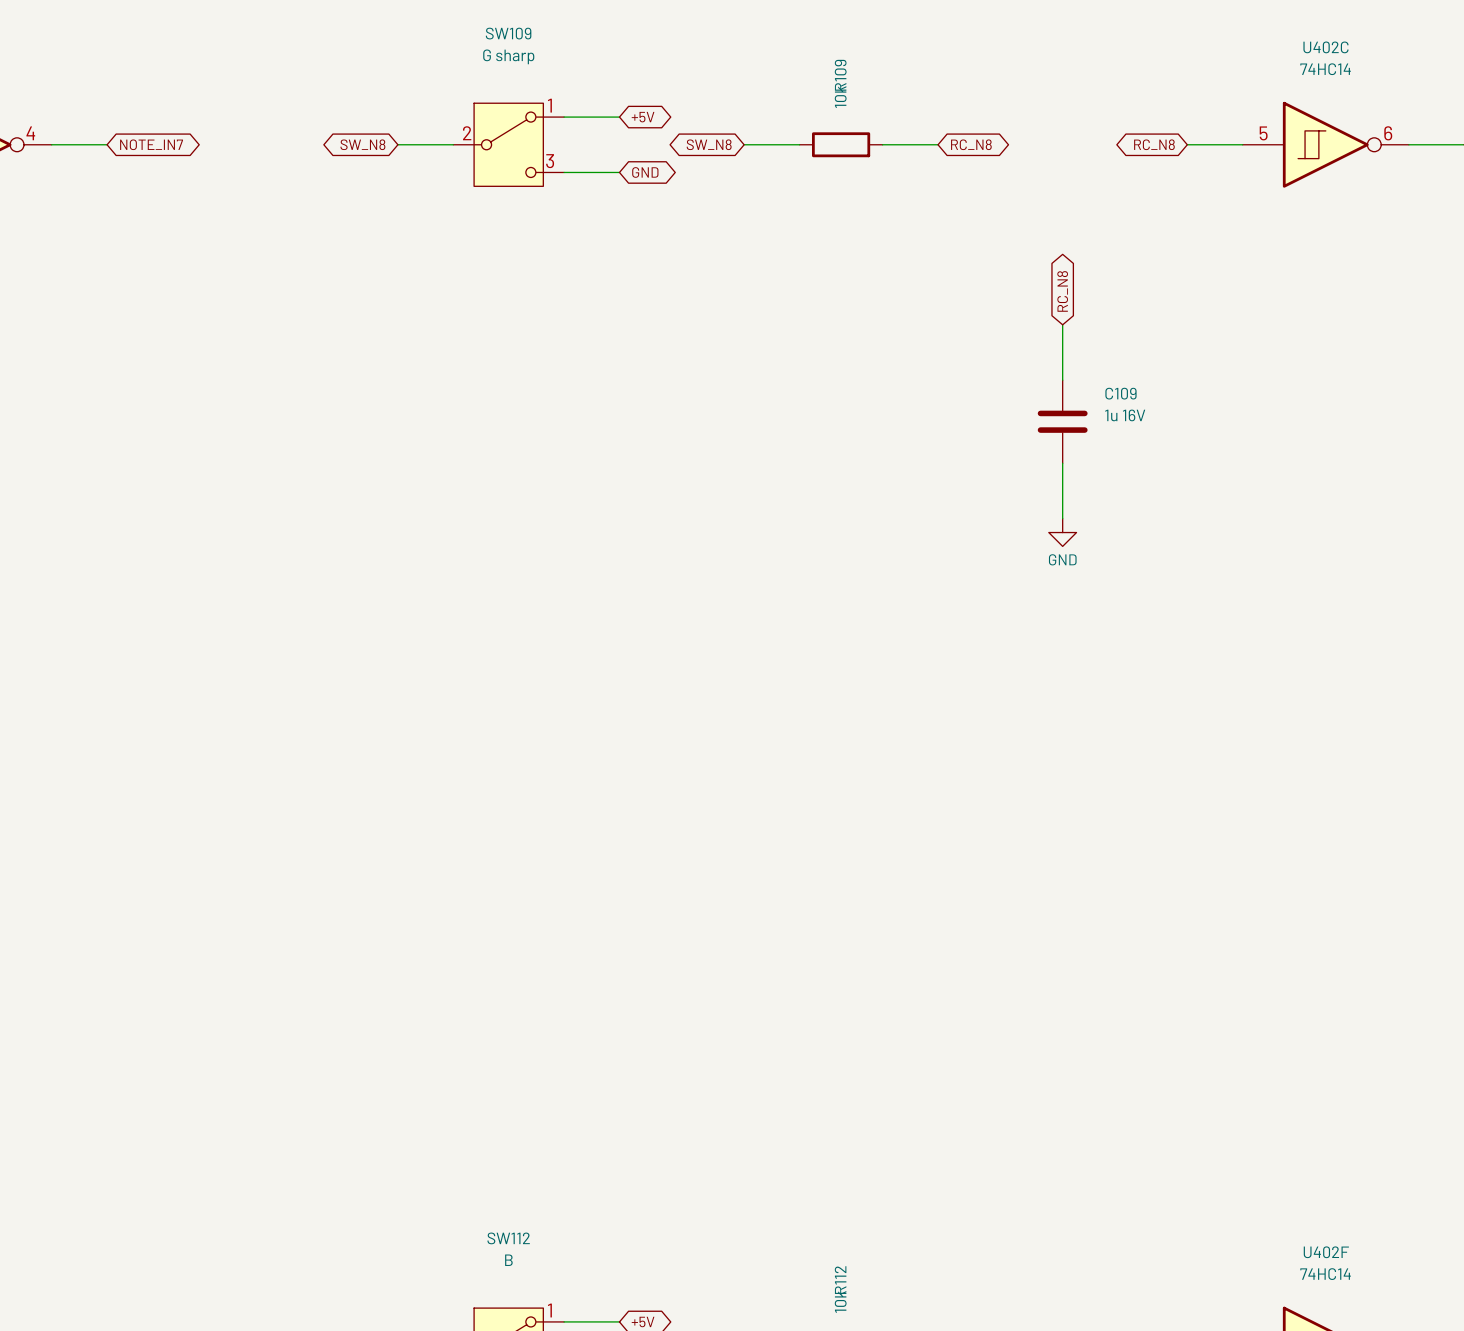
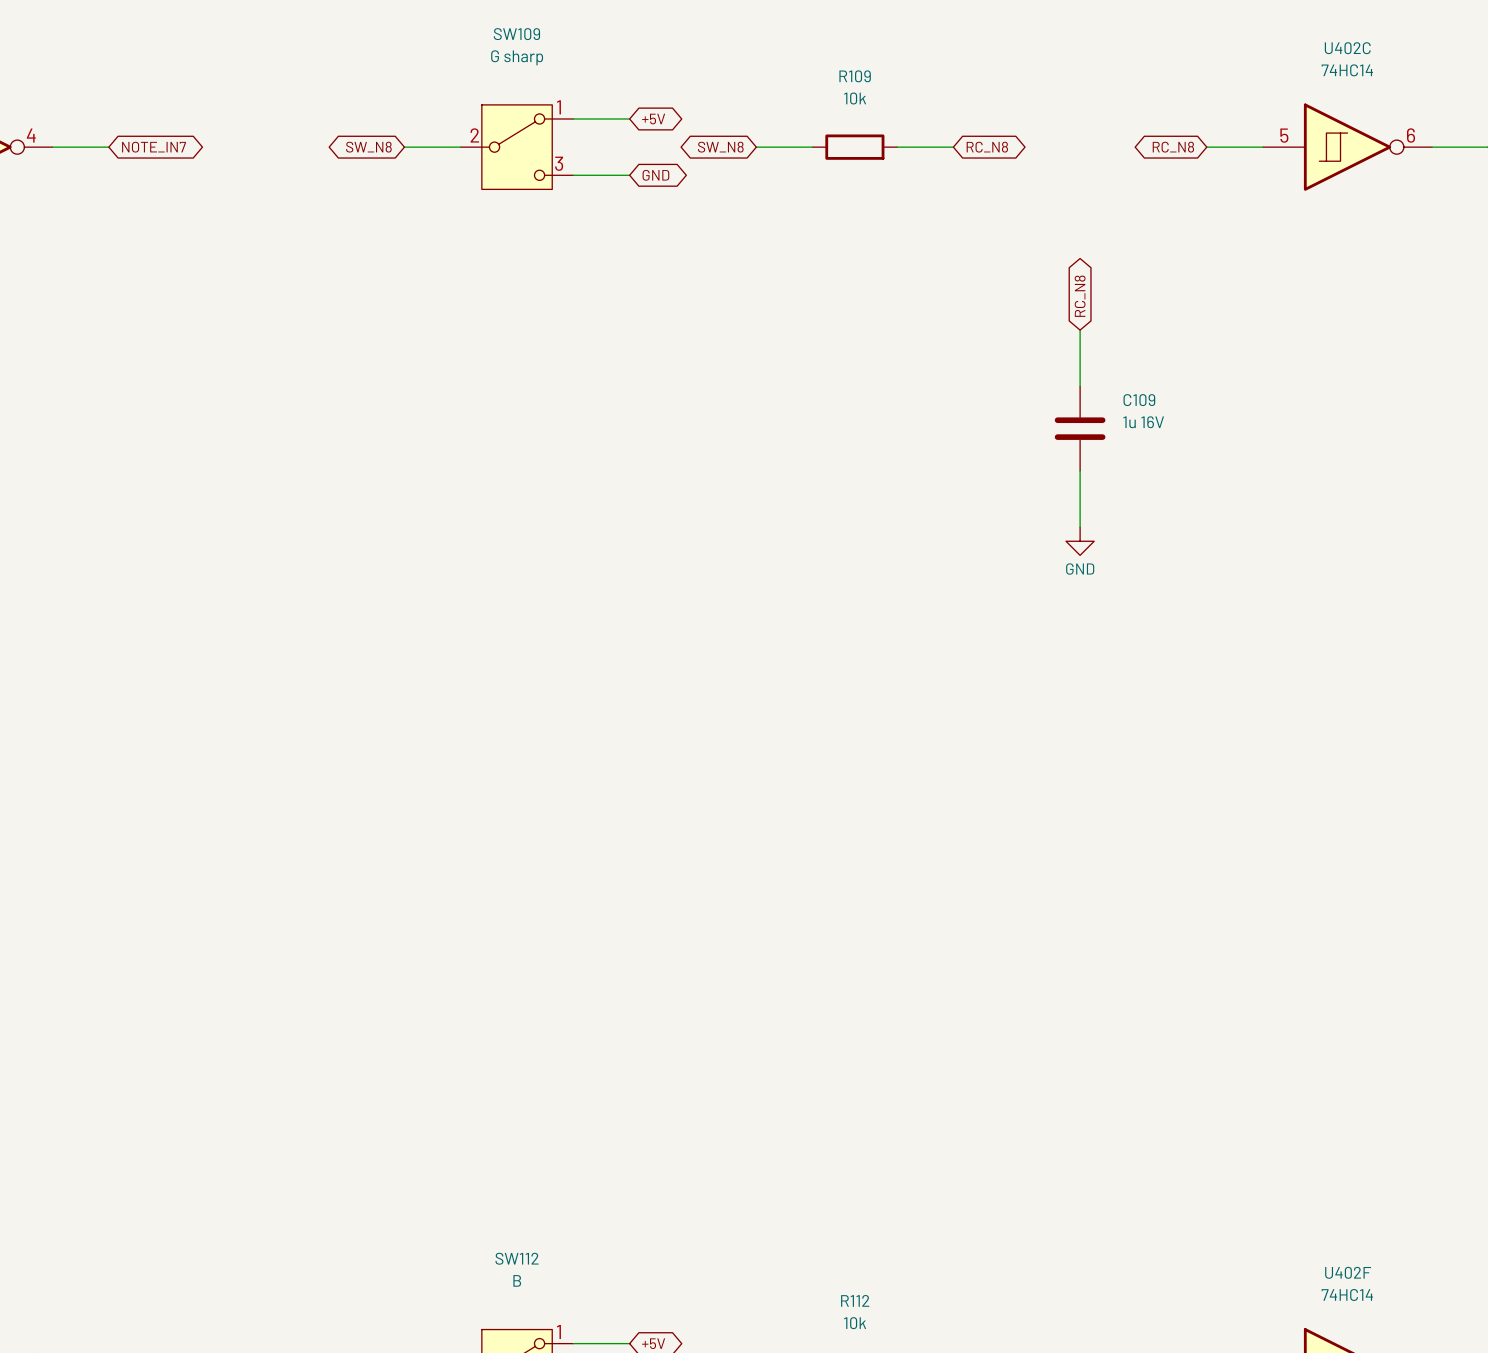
R109 name rotation: 0° (840, 75) -> 90° clockwise (855, 76)
R109 value rotation: 0° (840, 97) -> 90° clockwise (855, 98)
R112 name rotation: 0° (840, 1280) -> 90° clockwise (855, 1300)
R112 value rotation: 0° (840, 1301) -> 90° clockwise (855, 1323)

